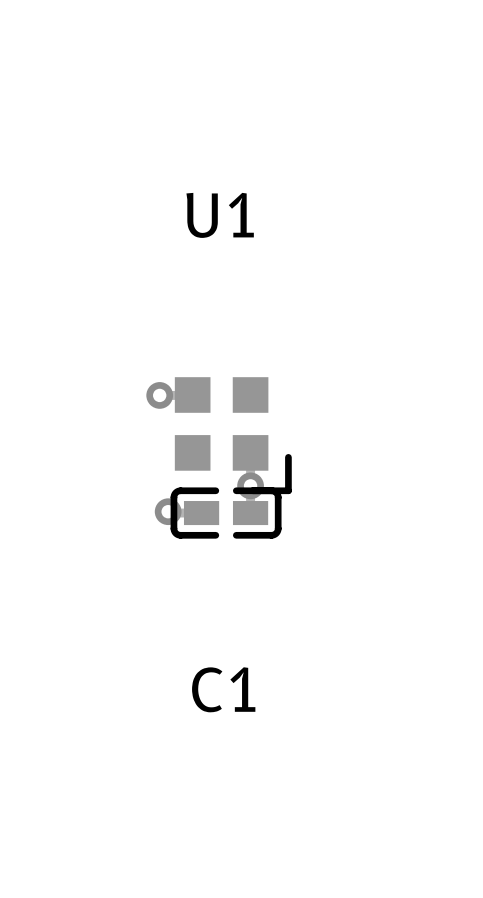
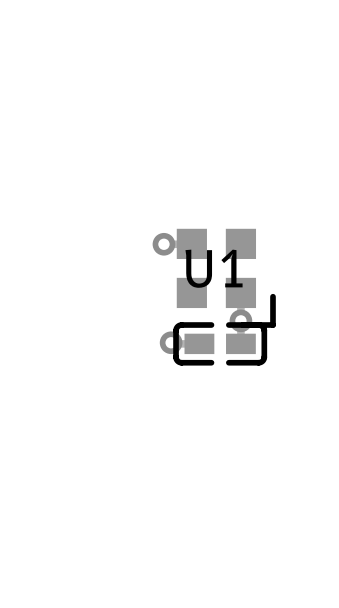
U1 name position: U1 (220, 215) -> U1 (214, 268)
C1 name: C1 (223, 689) -> none

